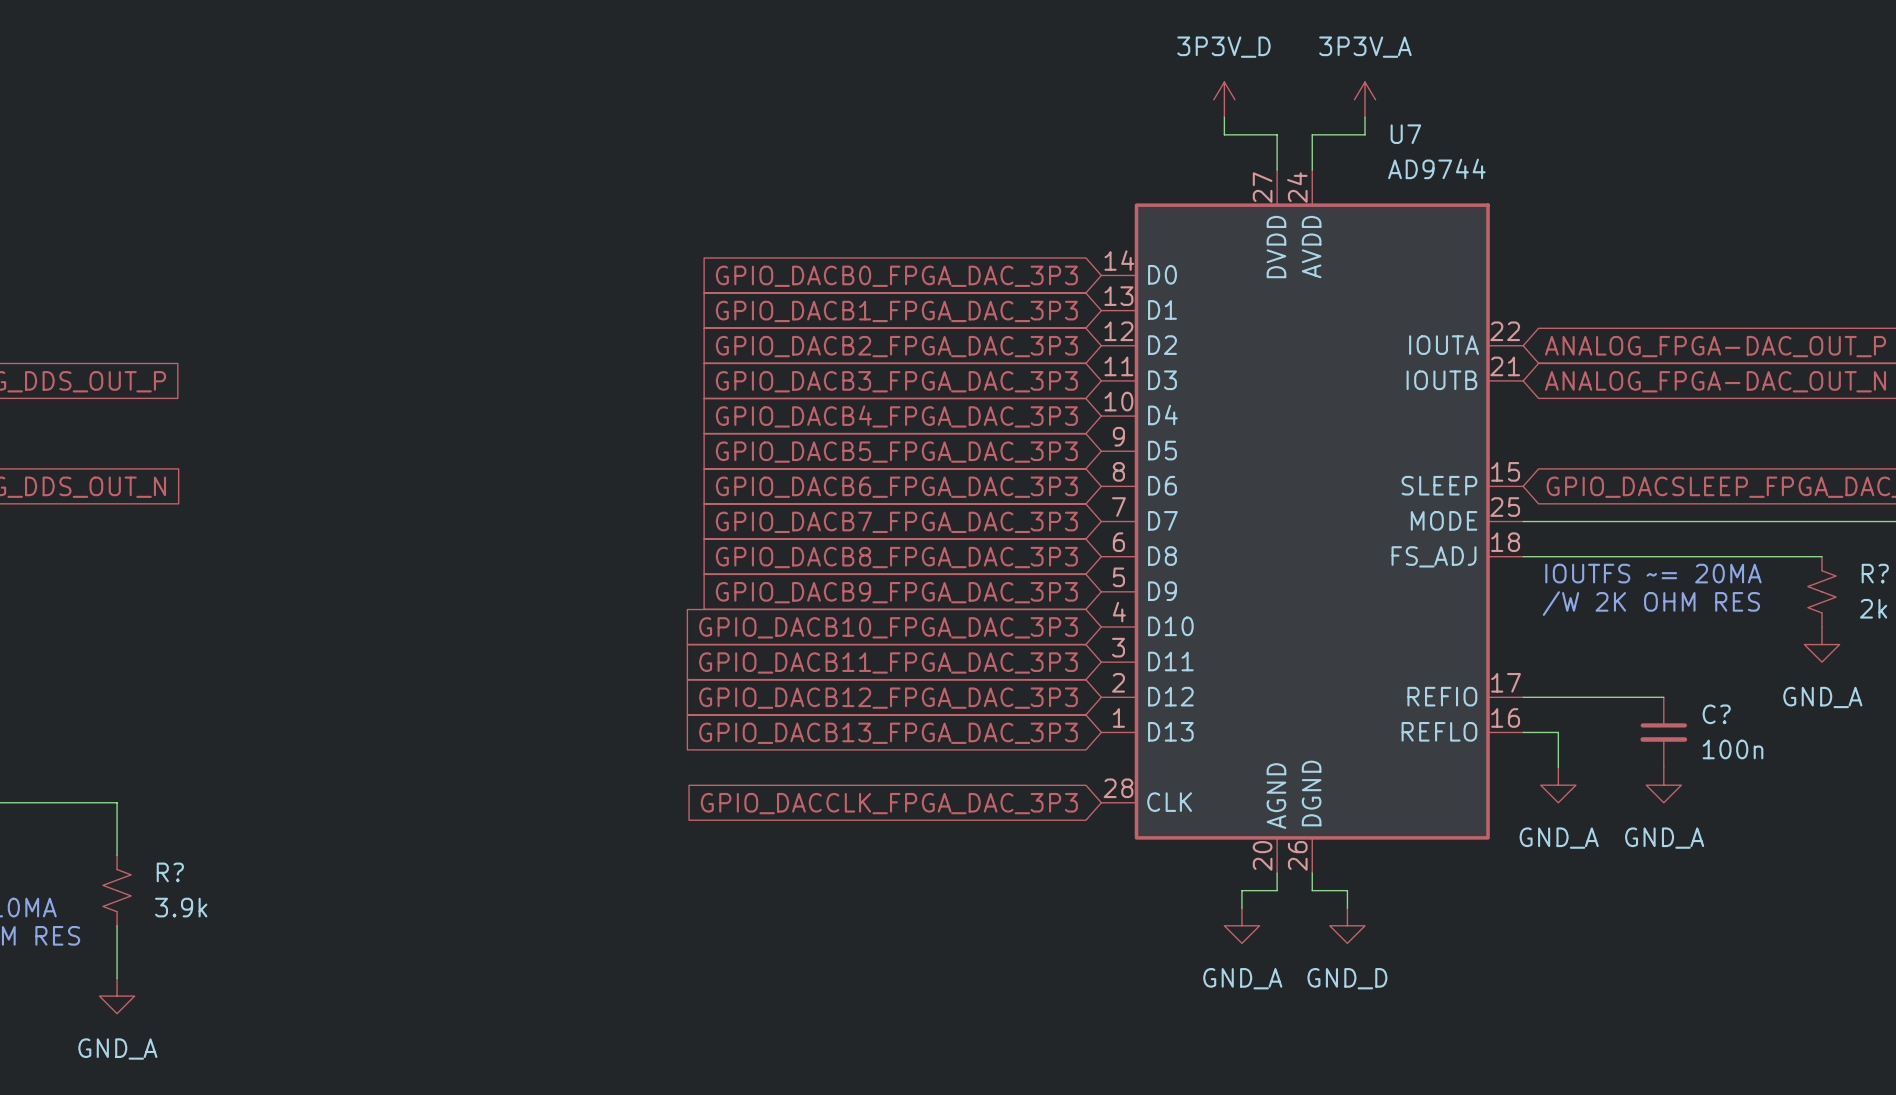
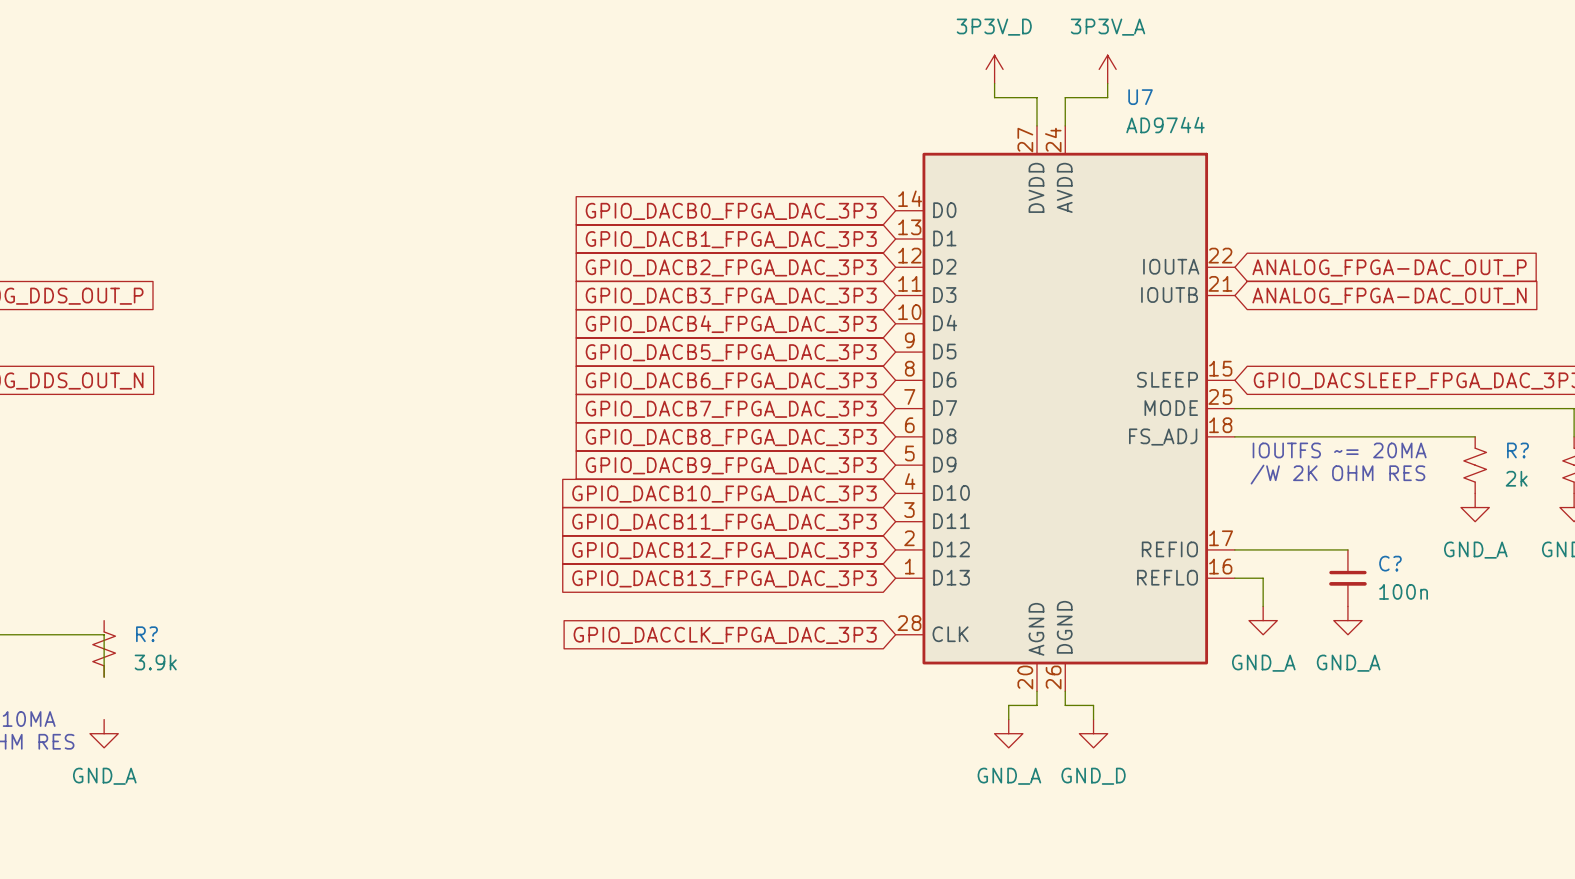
R? position: (117, 890) -> (104, 648)
wire: (117, 925) (117, 978) -> none
power symbol position: GND_A (117, 996) -> GND_A (104, 733)

